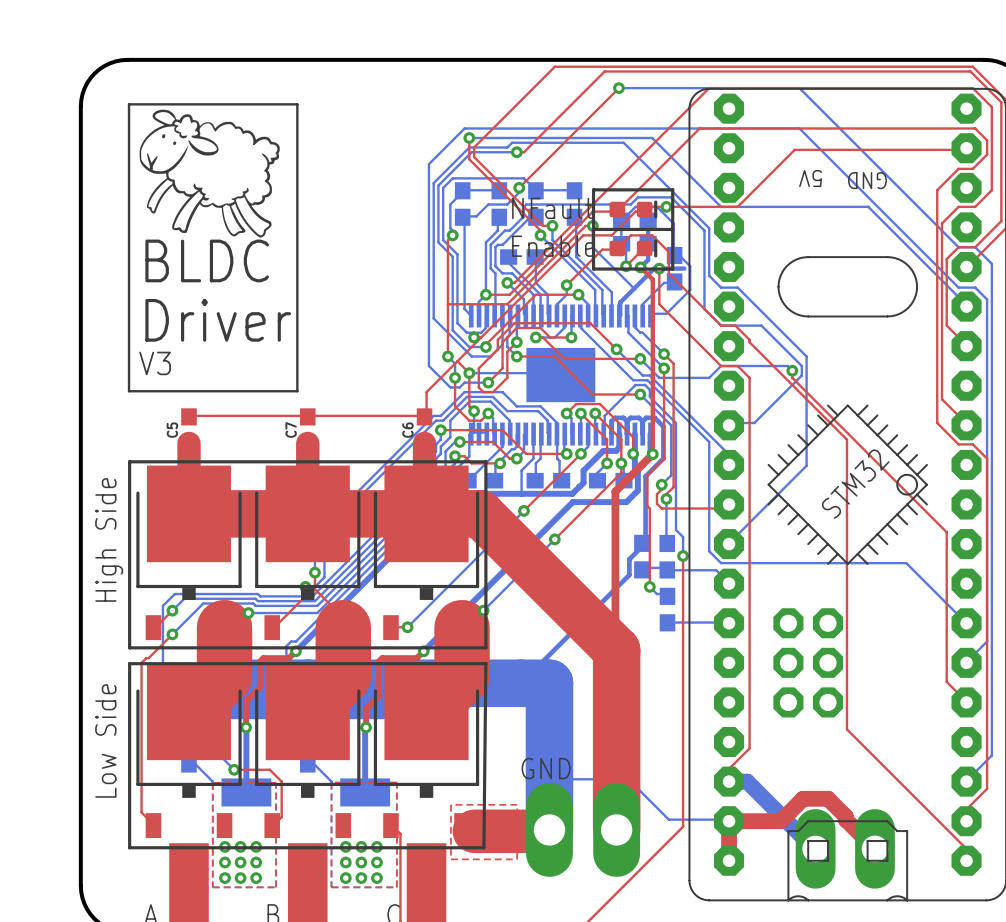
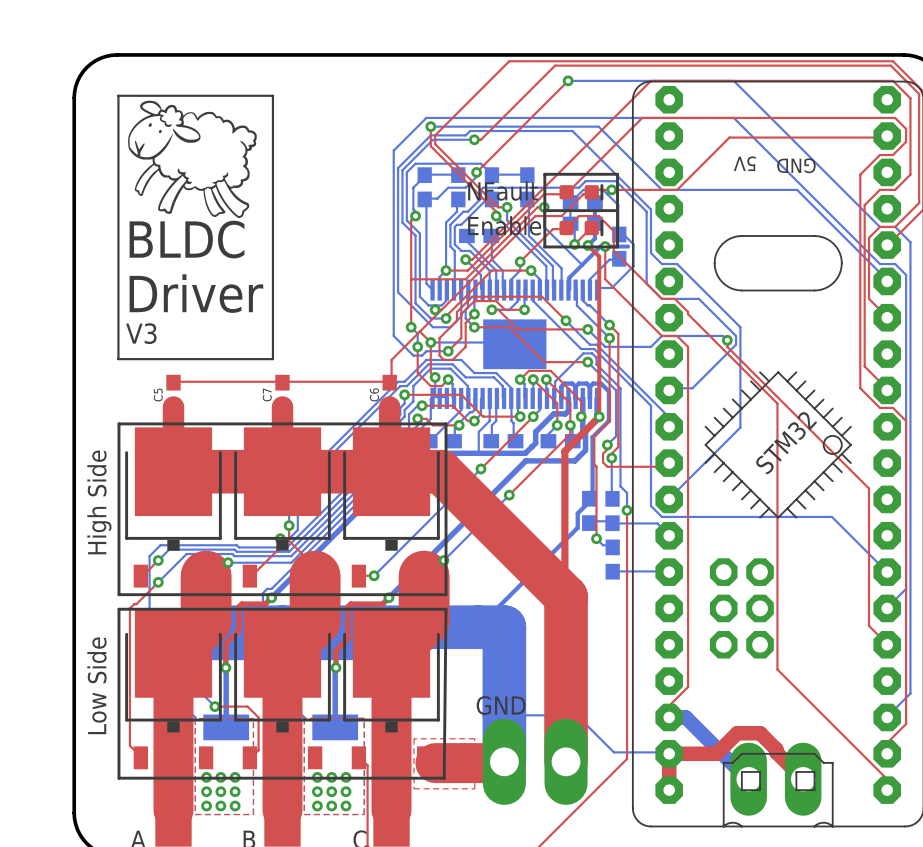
top track: none -> (173, 653) (173, 810)
top track: none -> (282, 653) (282, 810)
top track: none -> (391, 653) (391, 810)

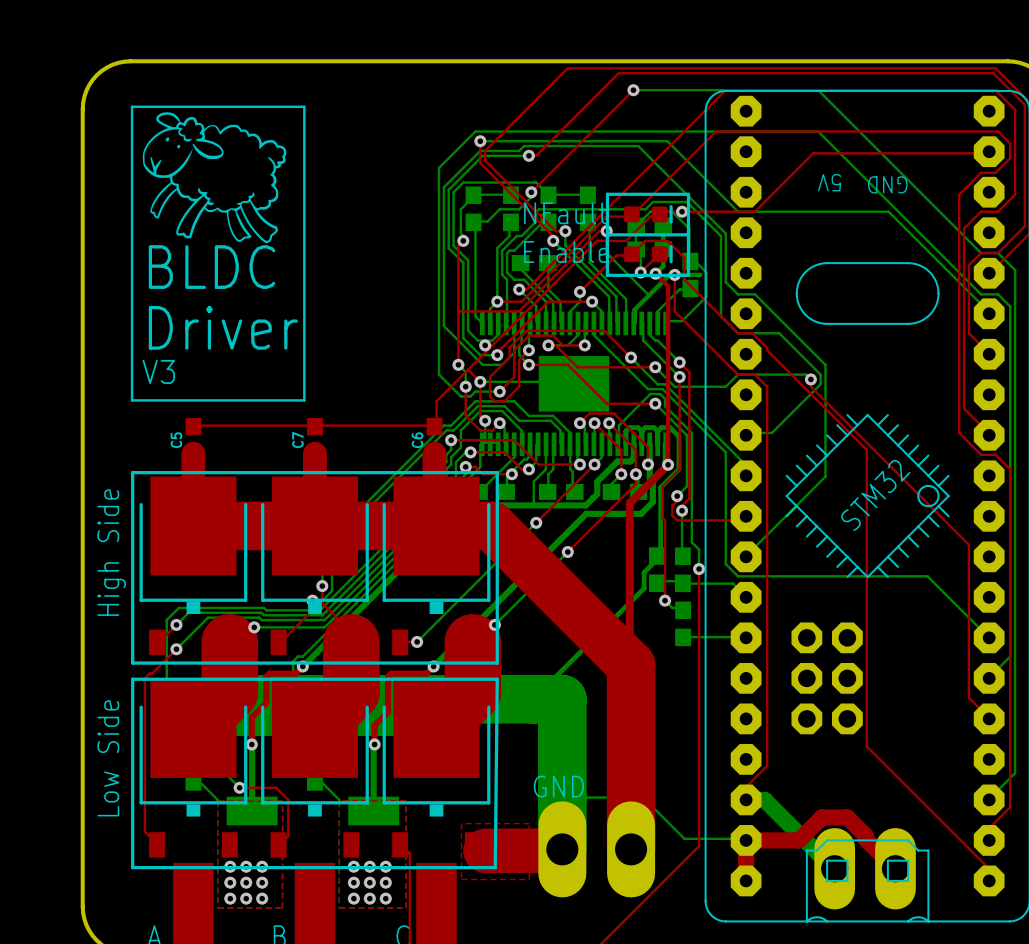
top track: (173, 653) (173, 810) -> none
top track: (282, 653) (282, 810) -> none
top track: (391, 653) (391, 810) -> none

